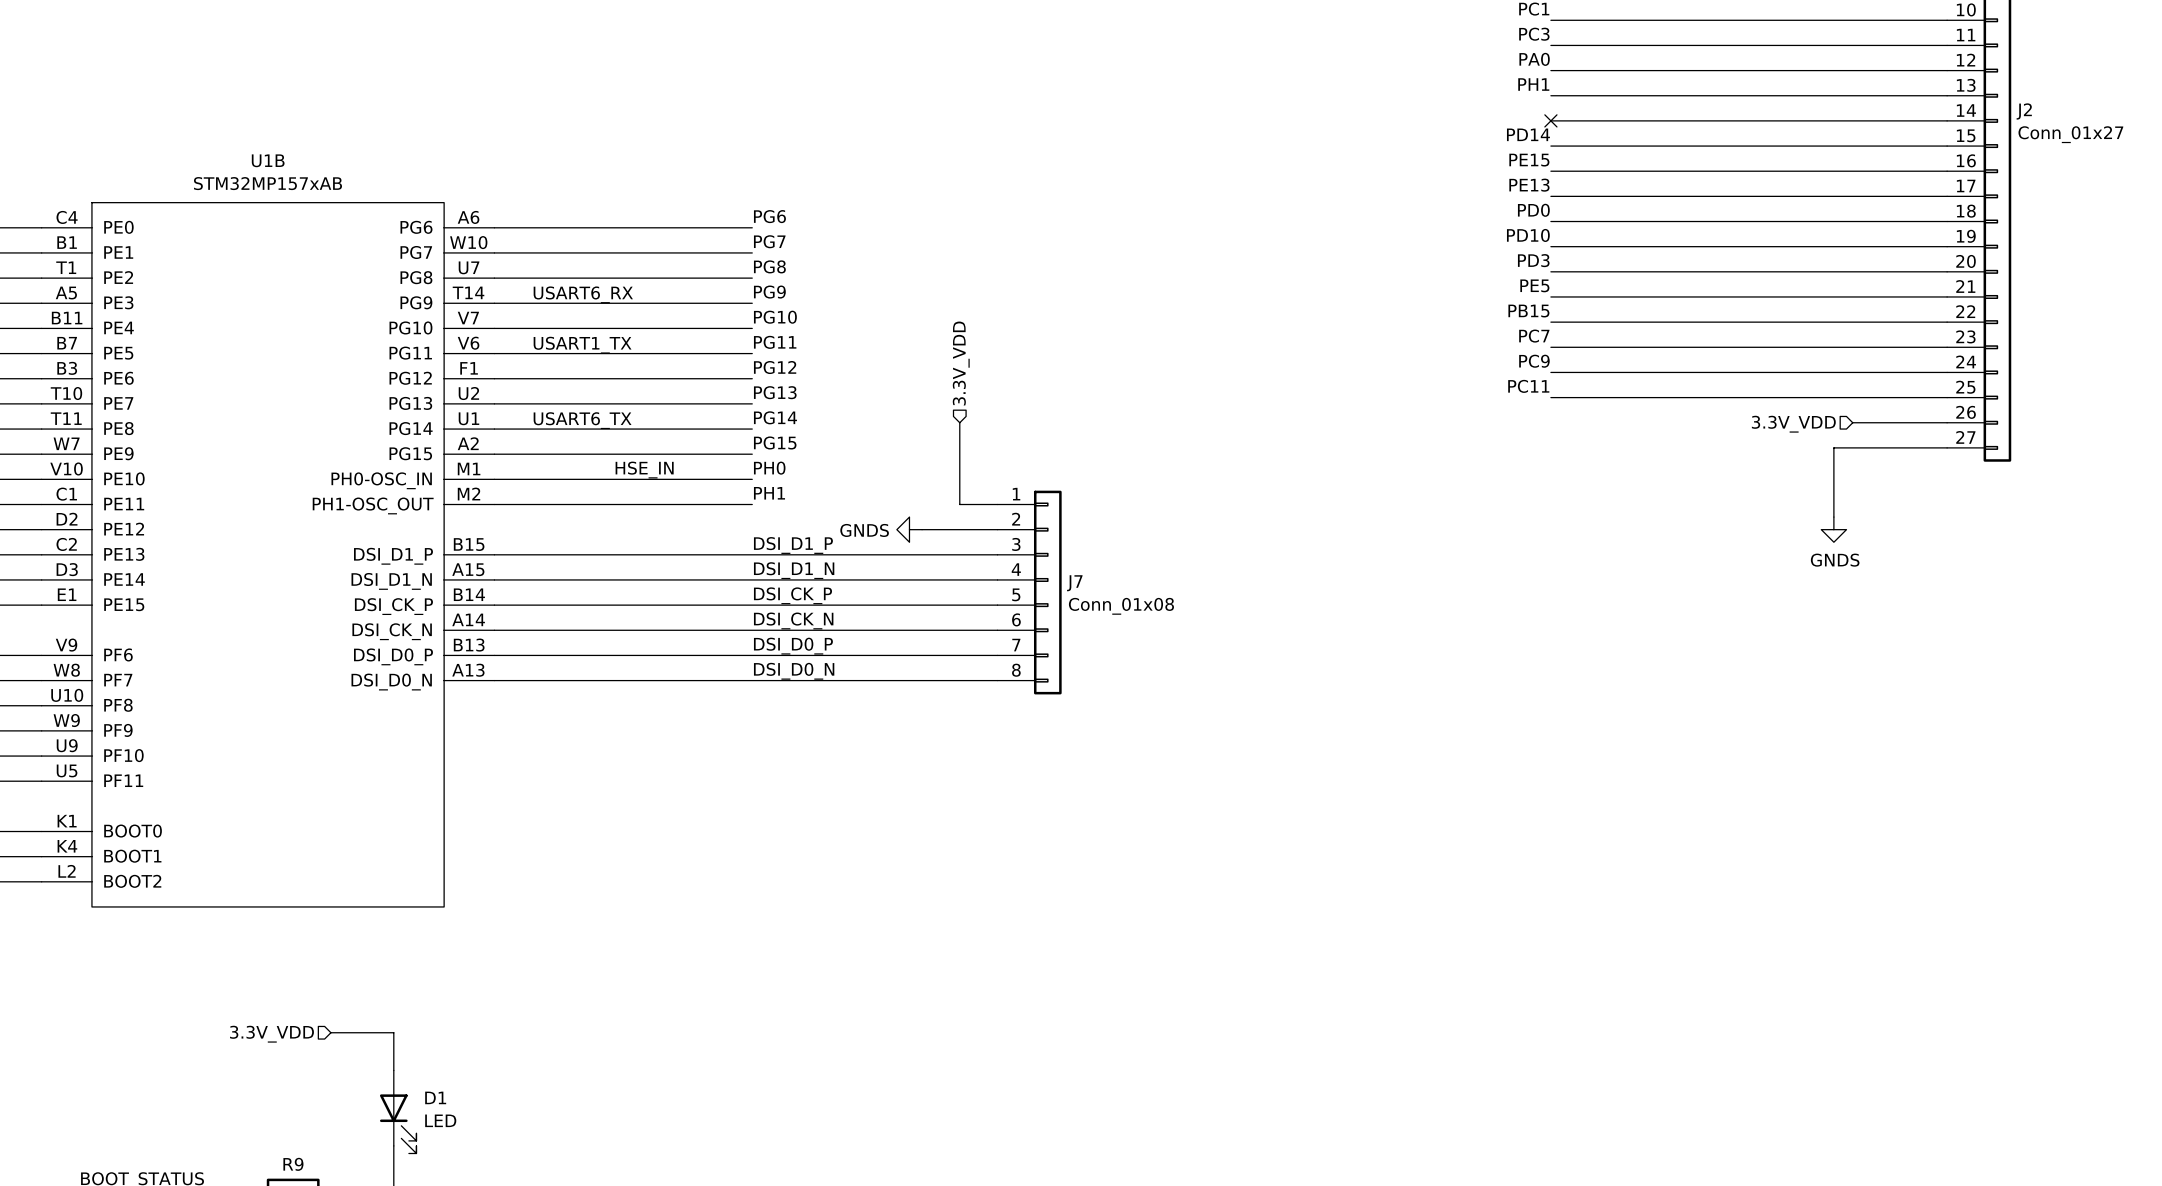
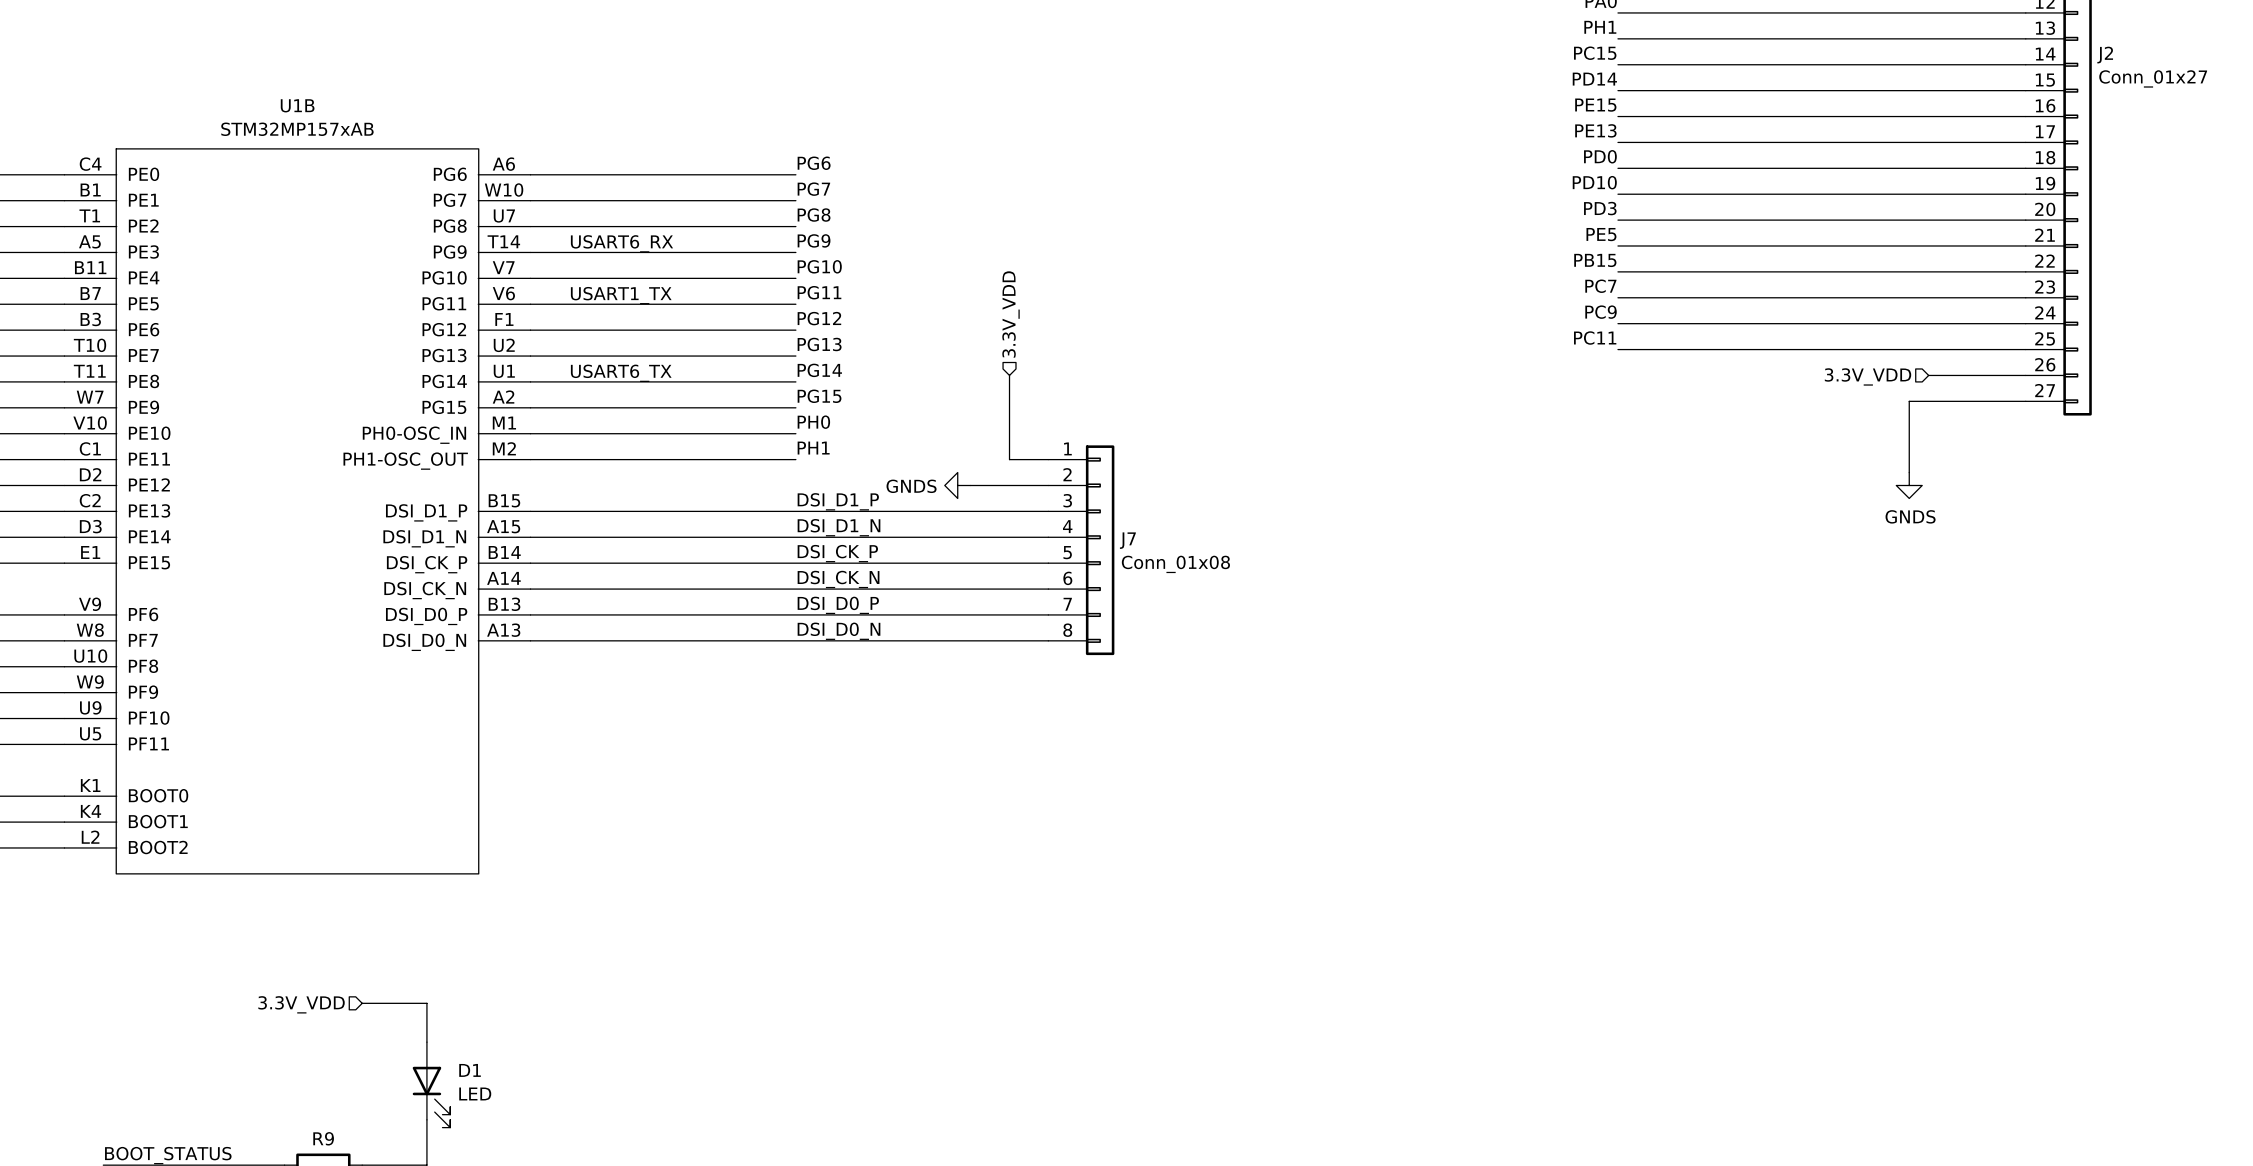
label: none -> PC15 (1595, 53)
no-connect mark: (1550, 120) -> none
label: HSE_IN (644, 470) -> none

